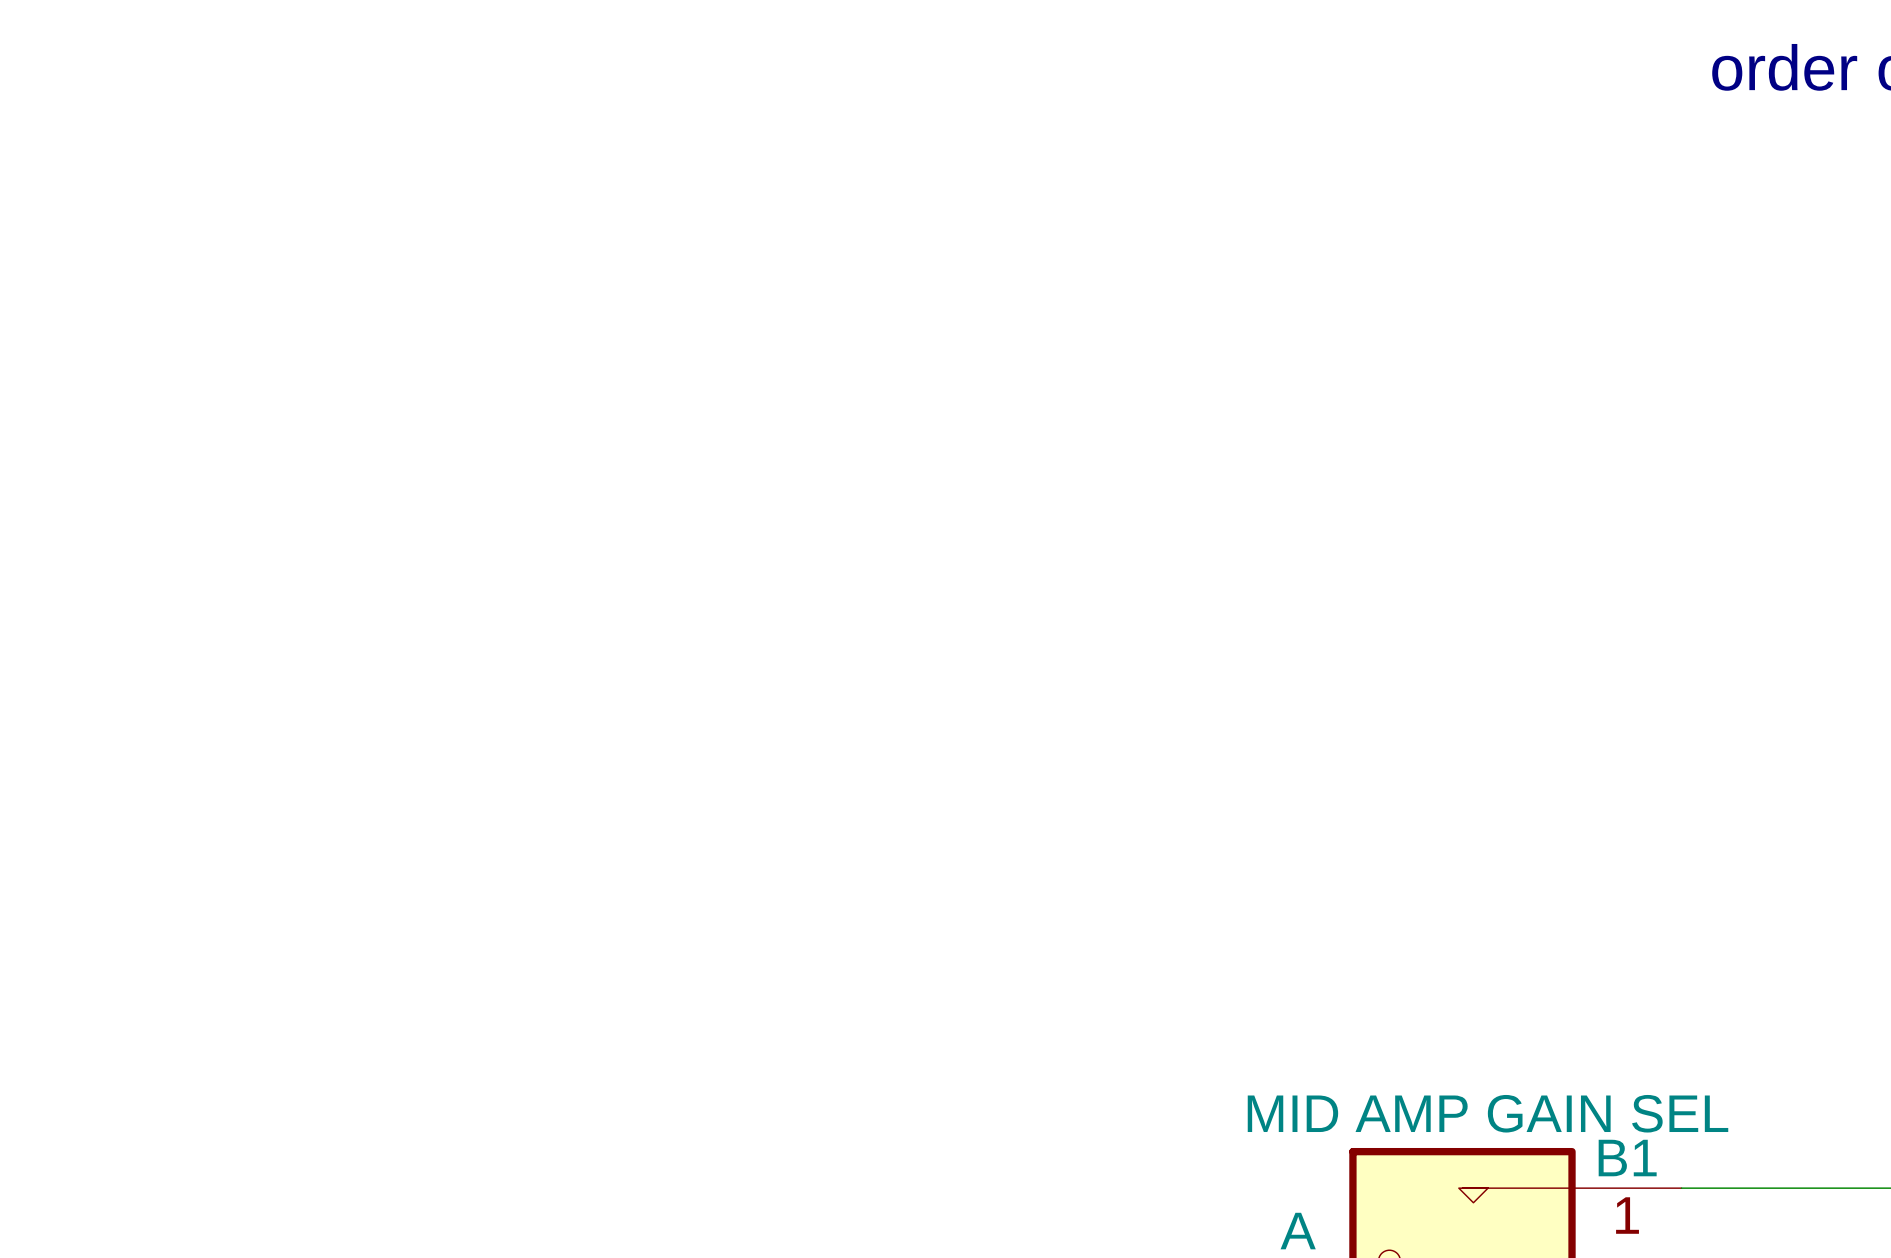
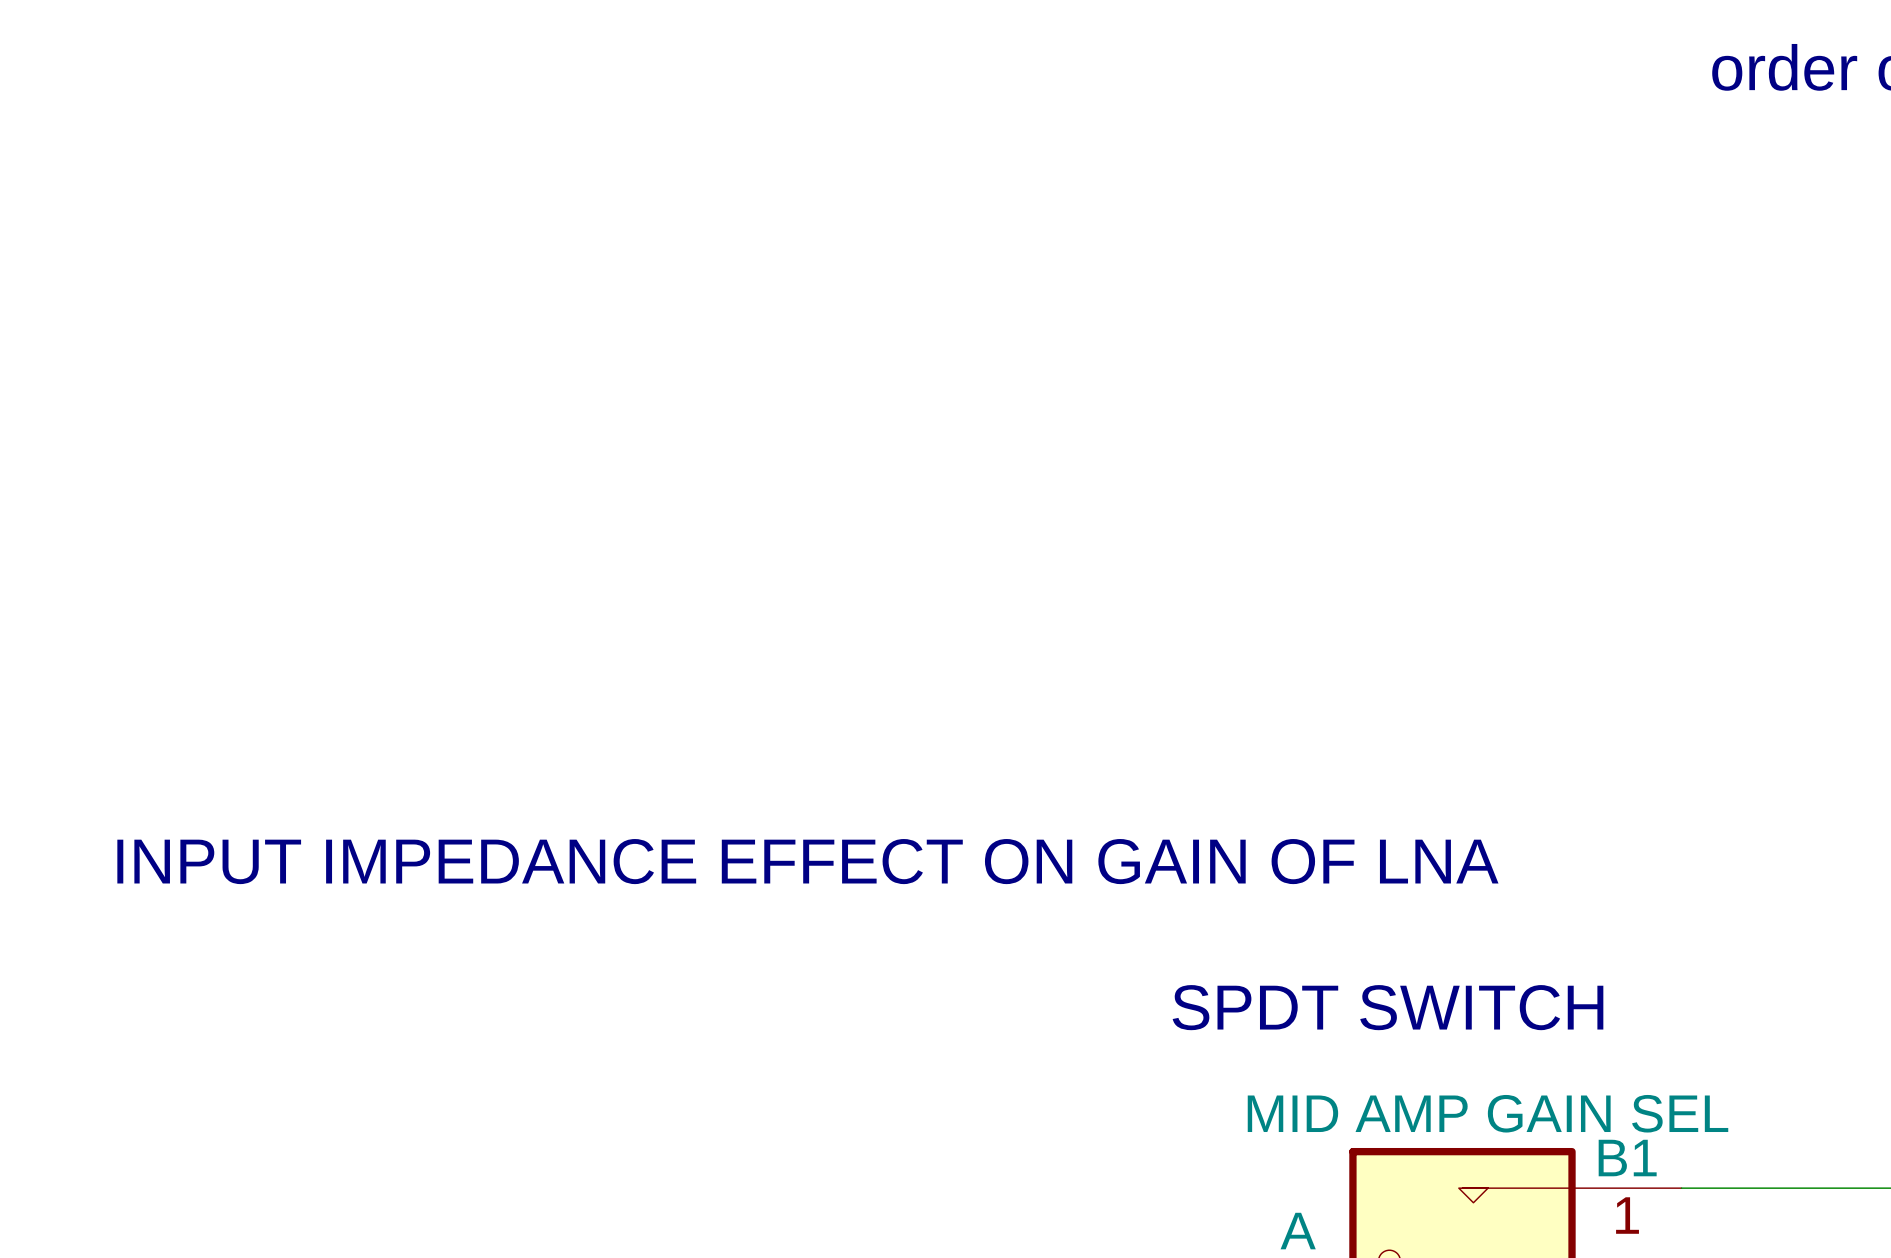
text: none -> INPUT IMPEDANCE EFFECT ON GAIN OF LNA (807, 861)
text: none -> SPDT SWITCH (1388, 1007)

